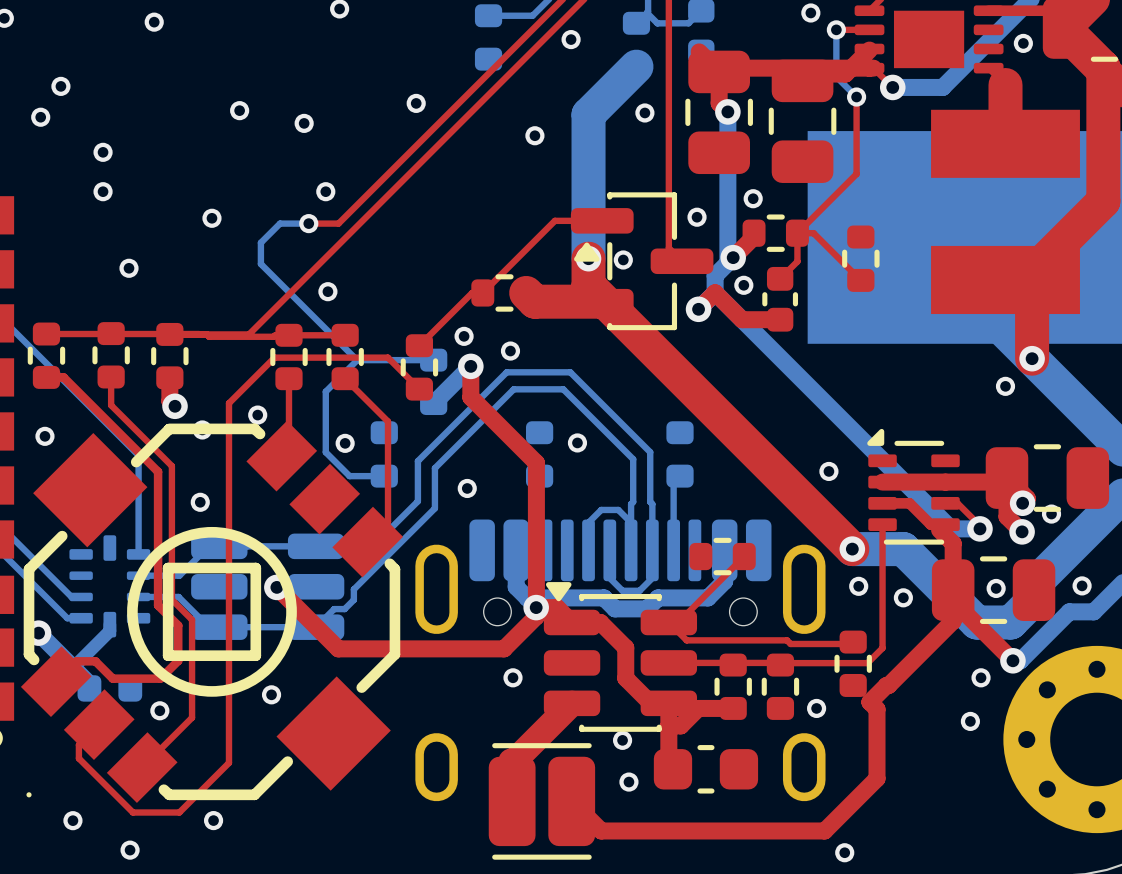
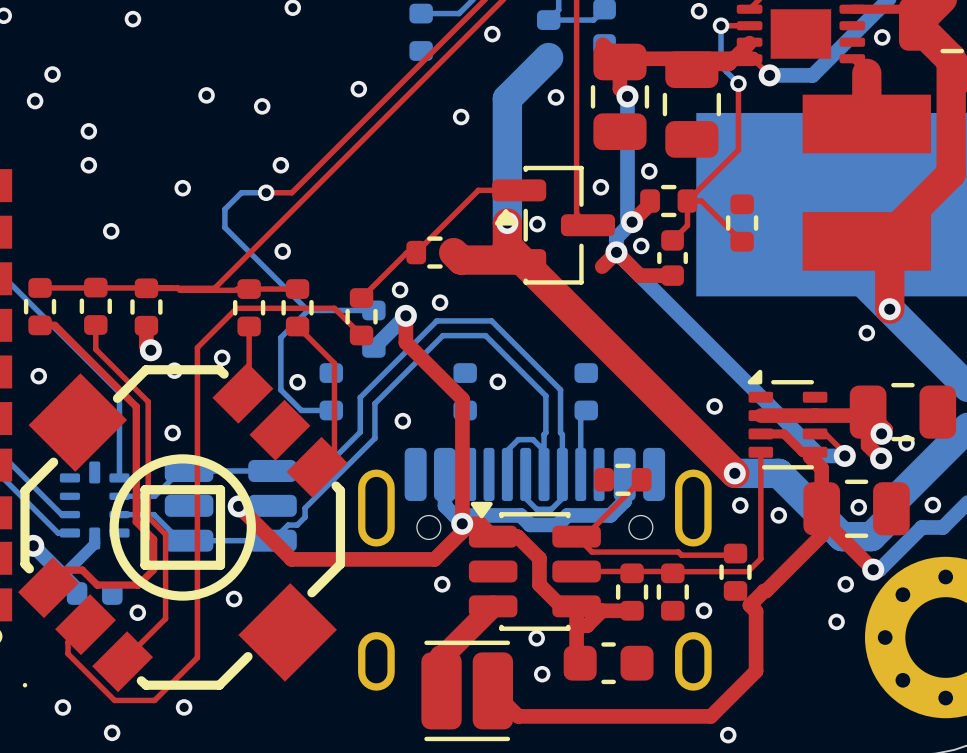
bottom track: (648, 11) (646, 12) (657, 23) (688, 23) -> (558, 10) (548, 20) (593, 20)
via position: (698, 309) -> (616, 252)

